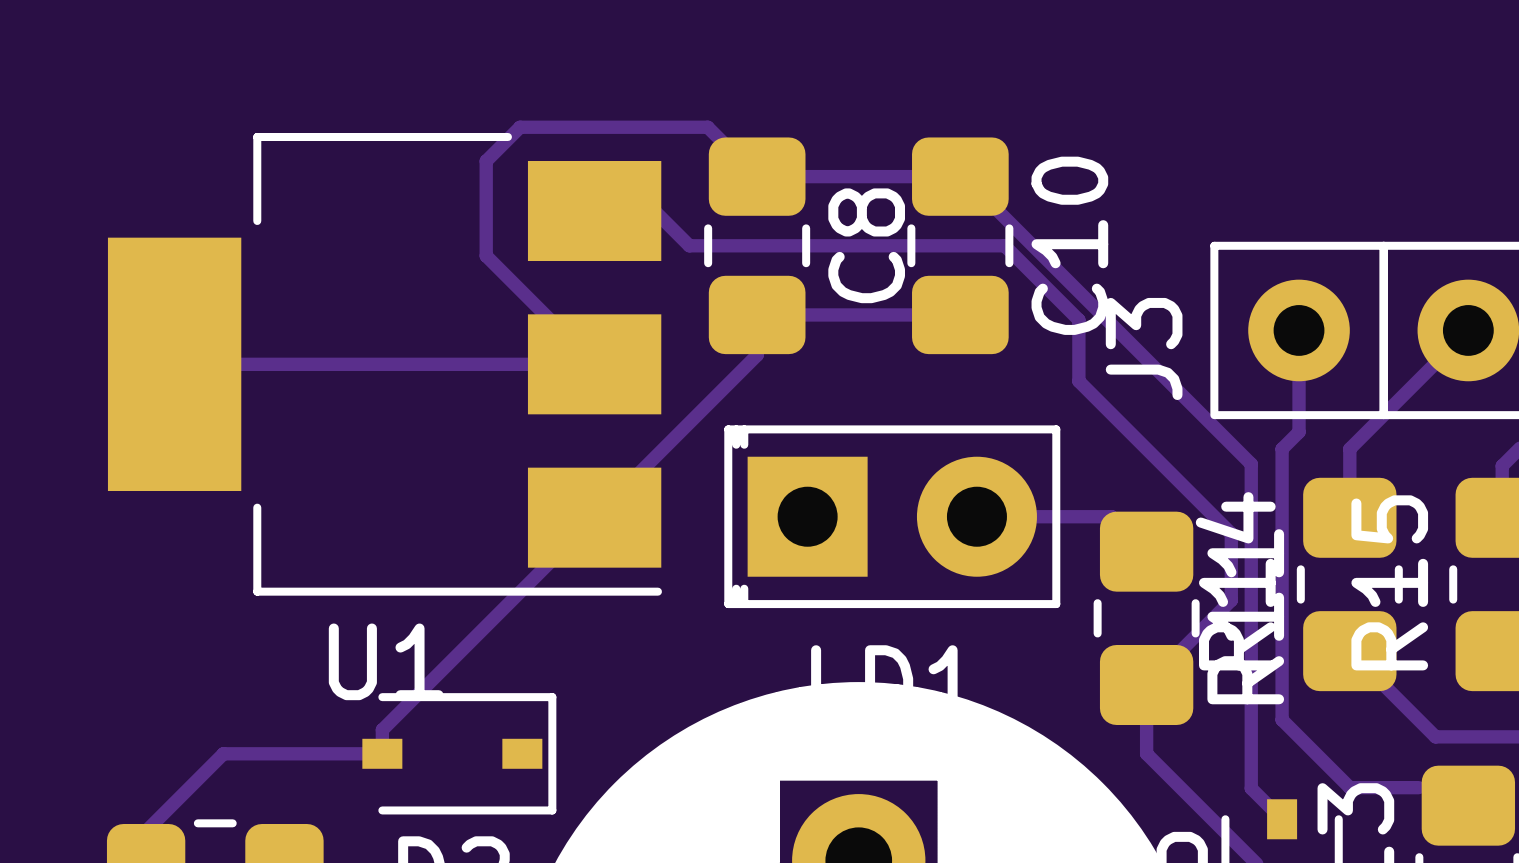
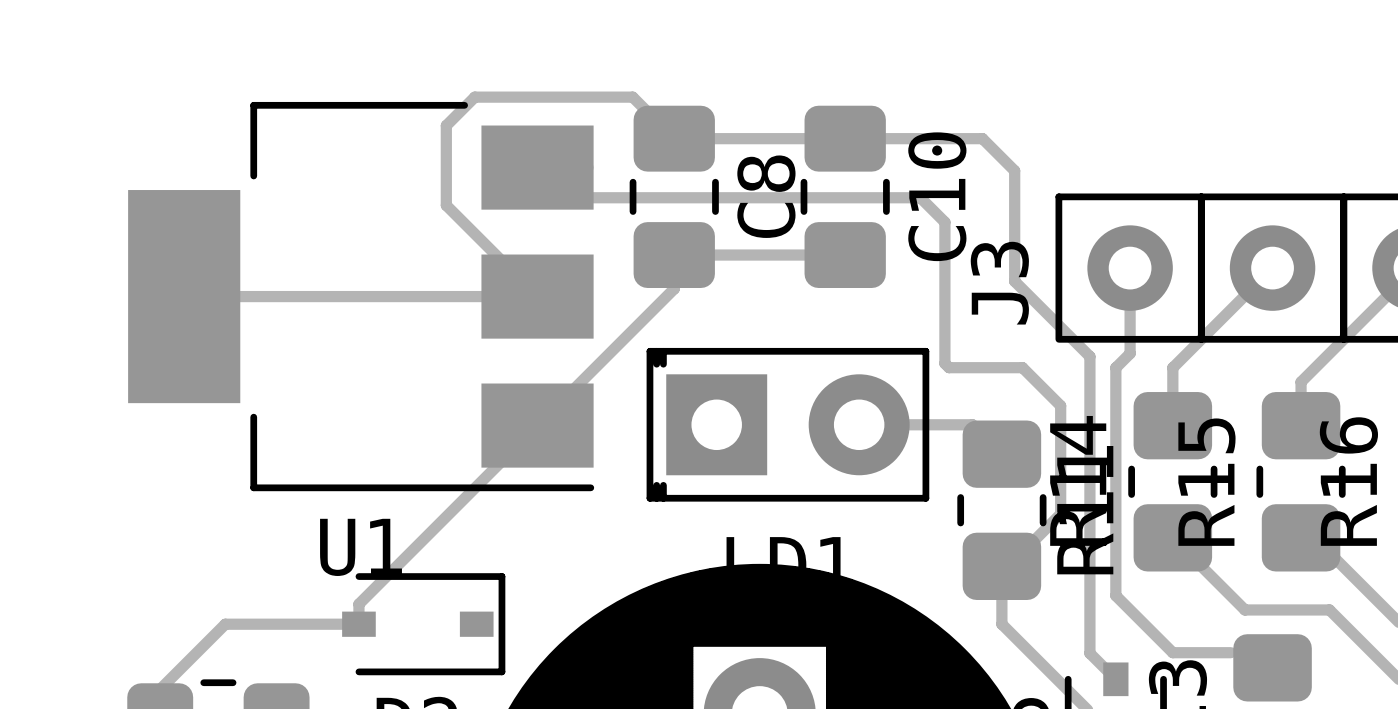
track: (963, 176) (1251, 464) -> (859, 138) (982, 138) (1014, 170) (1014, 281) (1089, 356) (1089, 380)
track: (654, 210) (689, 245) (1004, 245) (1078, 320) -> (537, 167) (567, 197) (920, 197) (944, 222) (944, 259)
track: (1078, 381) (1231, 533) (1231, 600) (1146, 684) -> (944, 310) (944, 363) (949, 367) (1022, 367) (1060, 405) (1060, 514) (1008, 566) (1001, 566)

